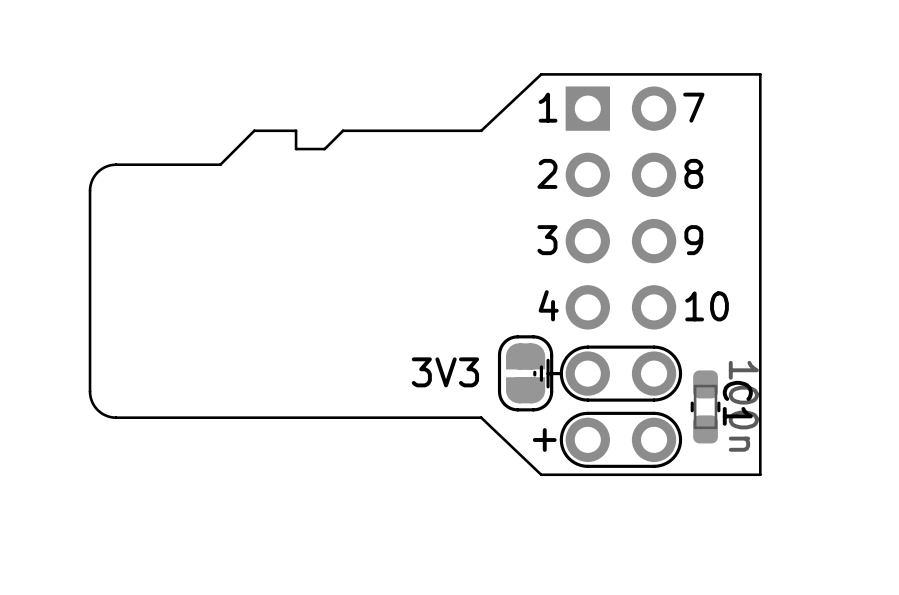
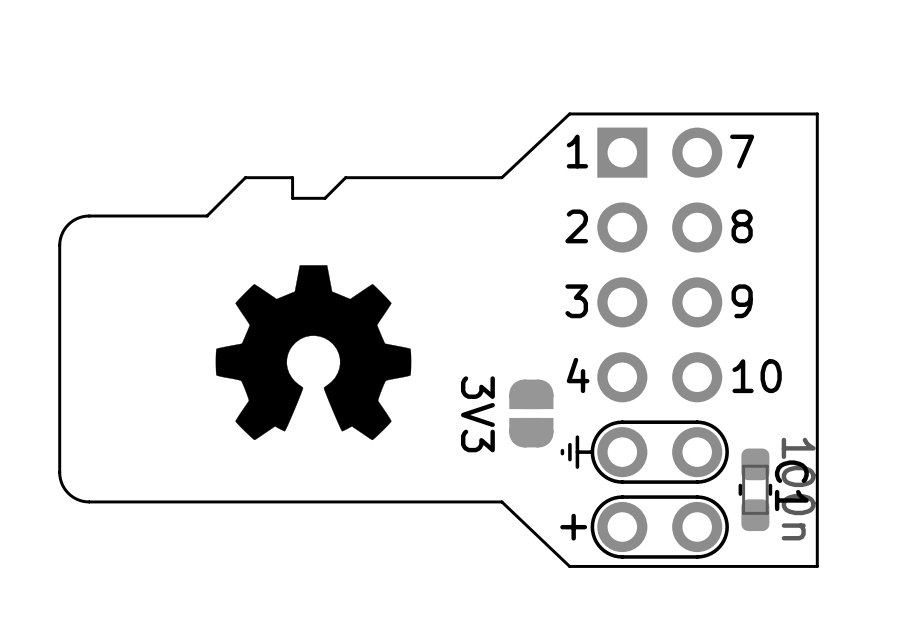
drawing: none -> [215, 265, 412, 441]
part: none -> 3V3 (531, 413)
part: 3V3 (525, 373) -> none

